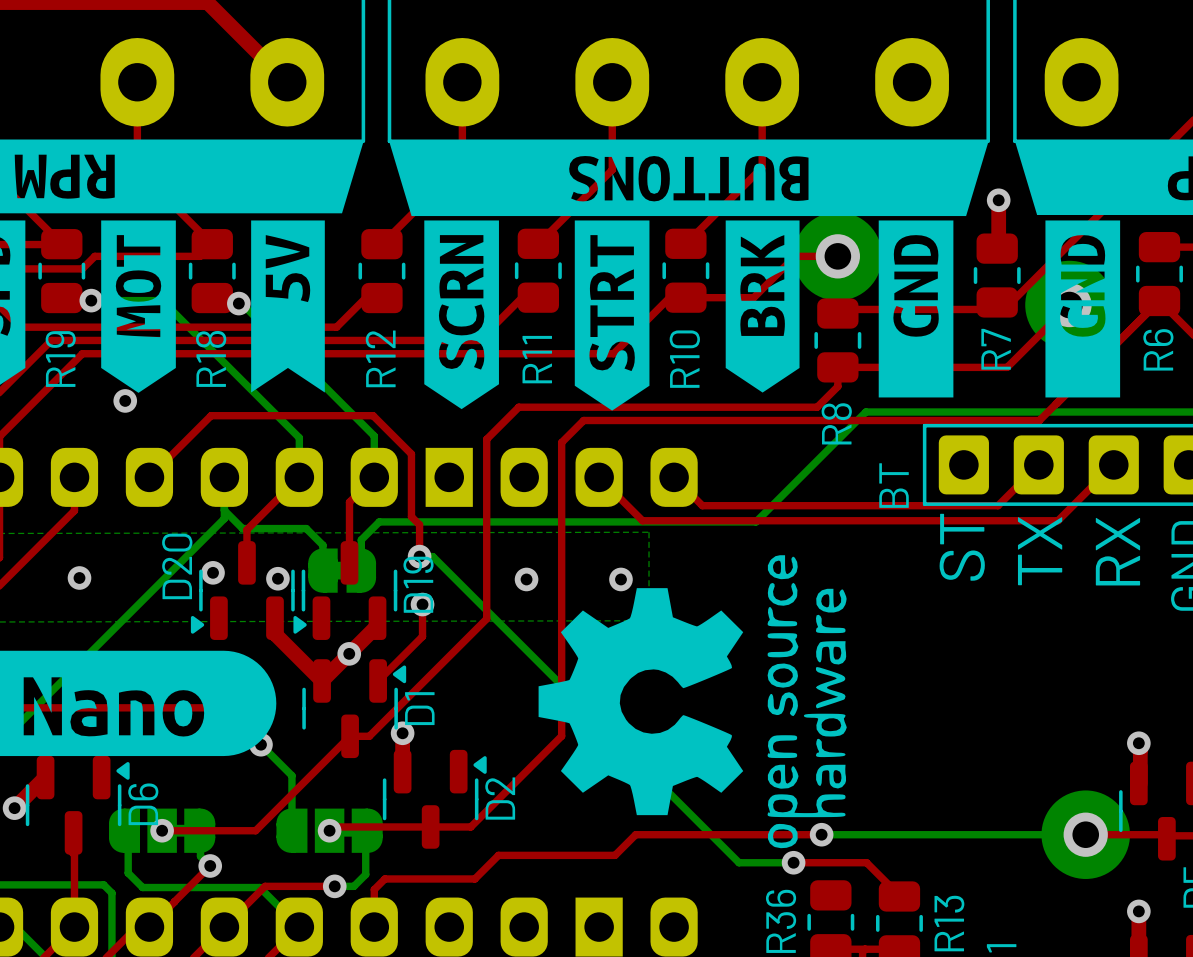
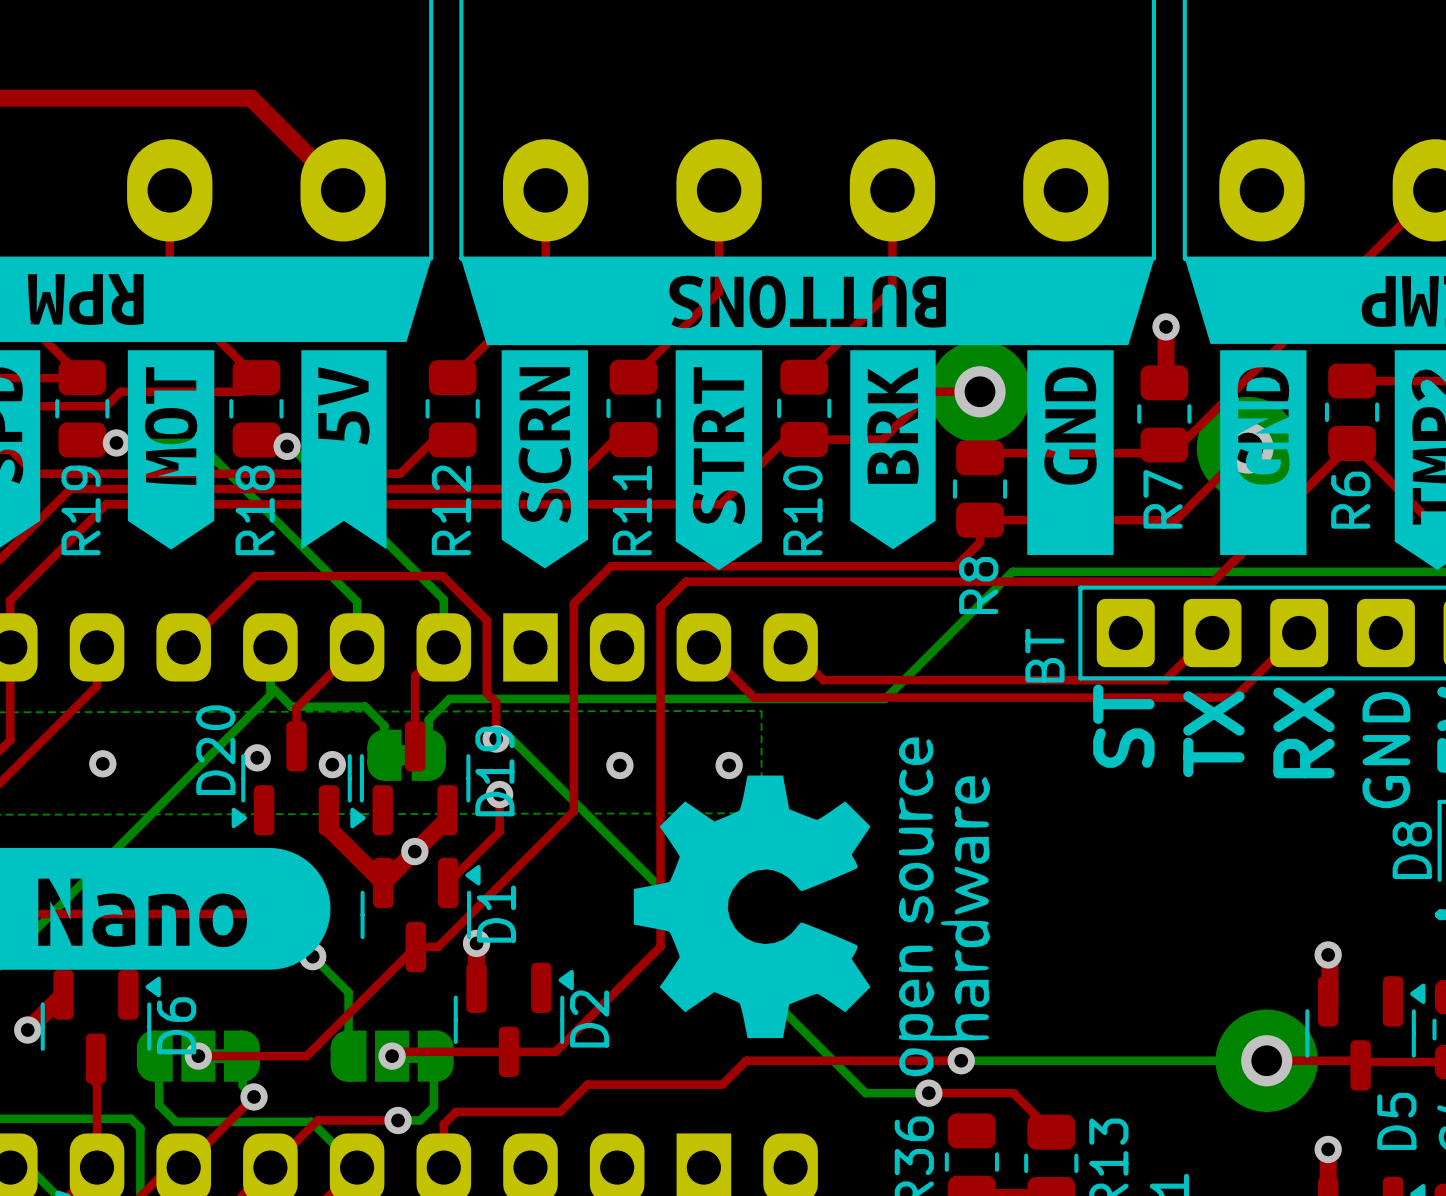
via: (125, 400) -> none

